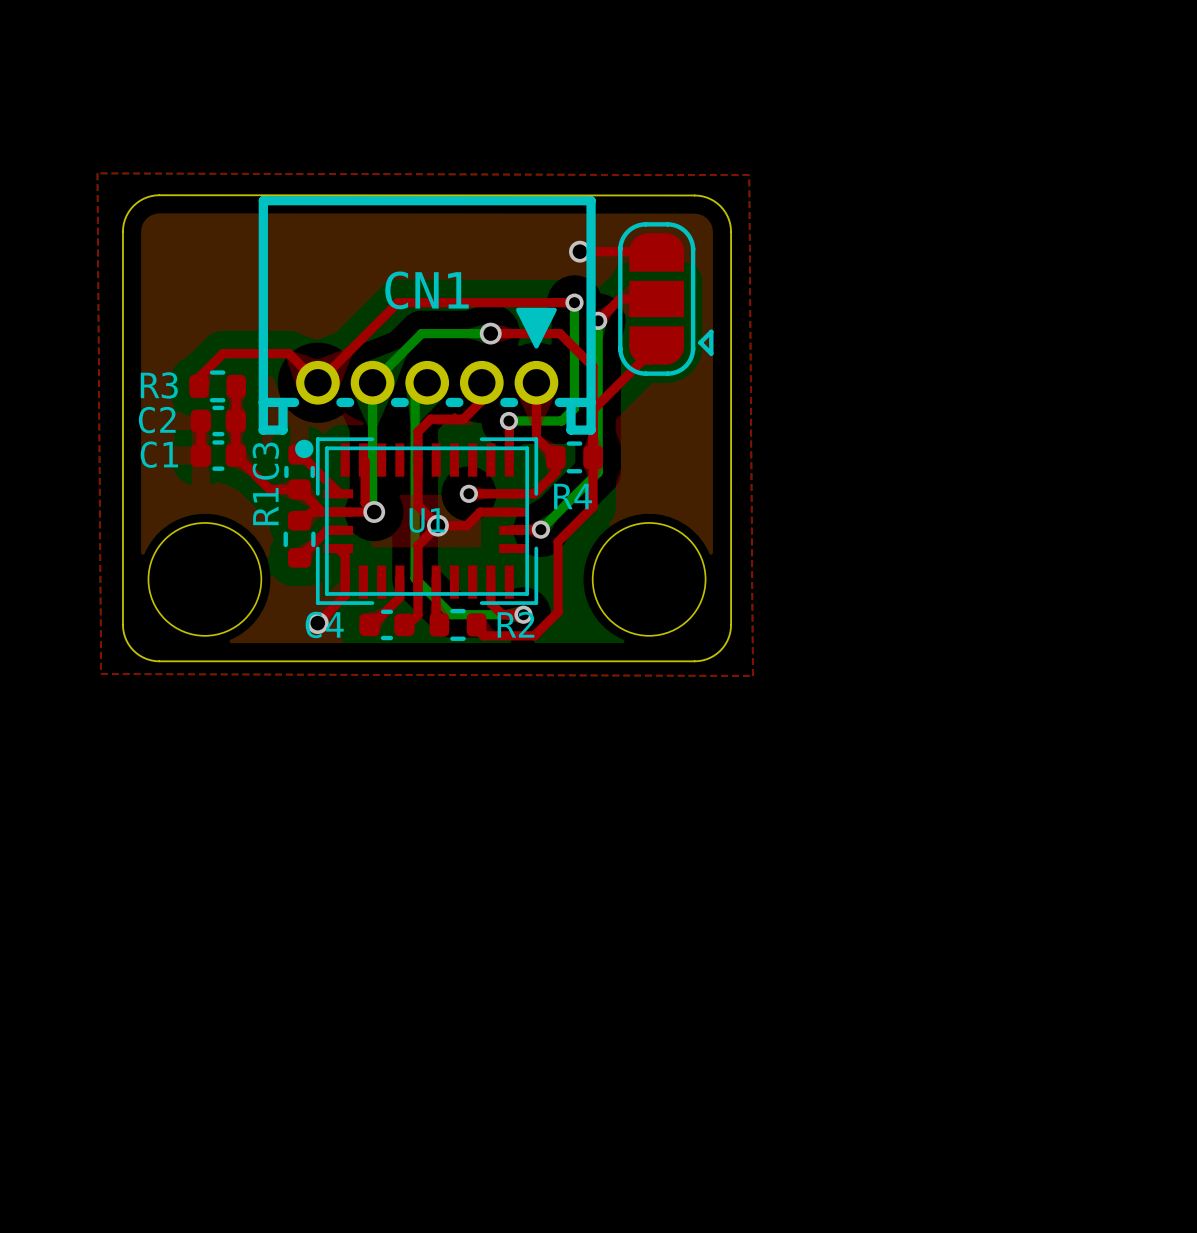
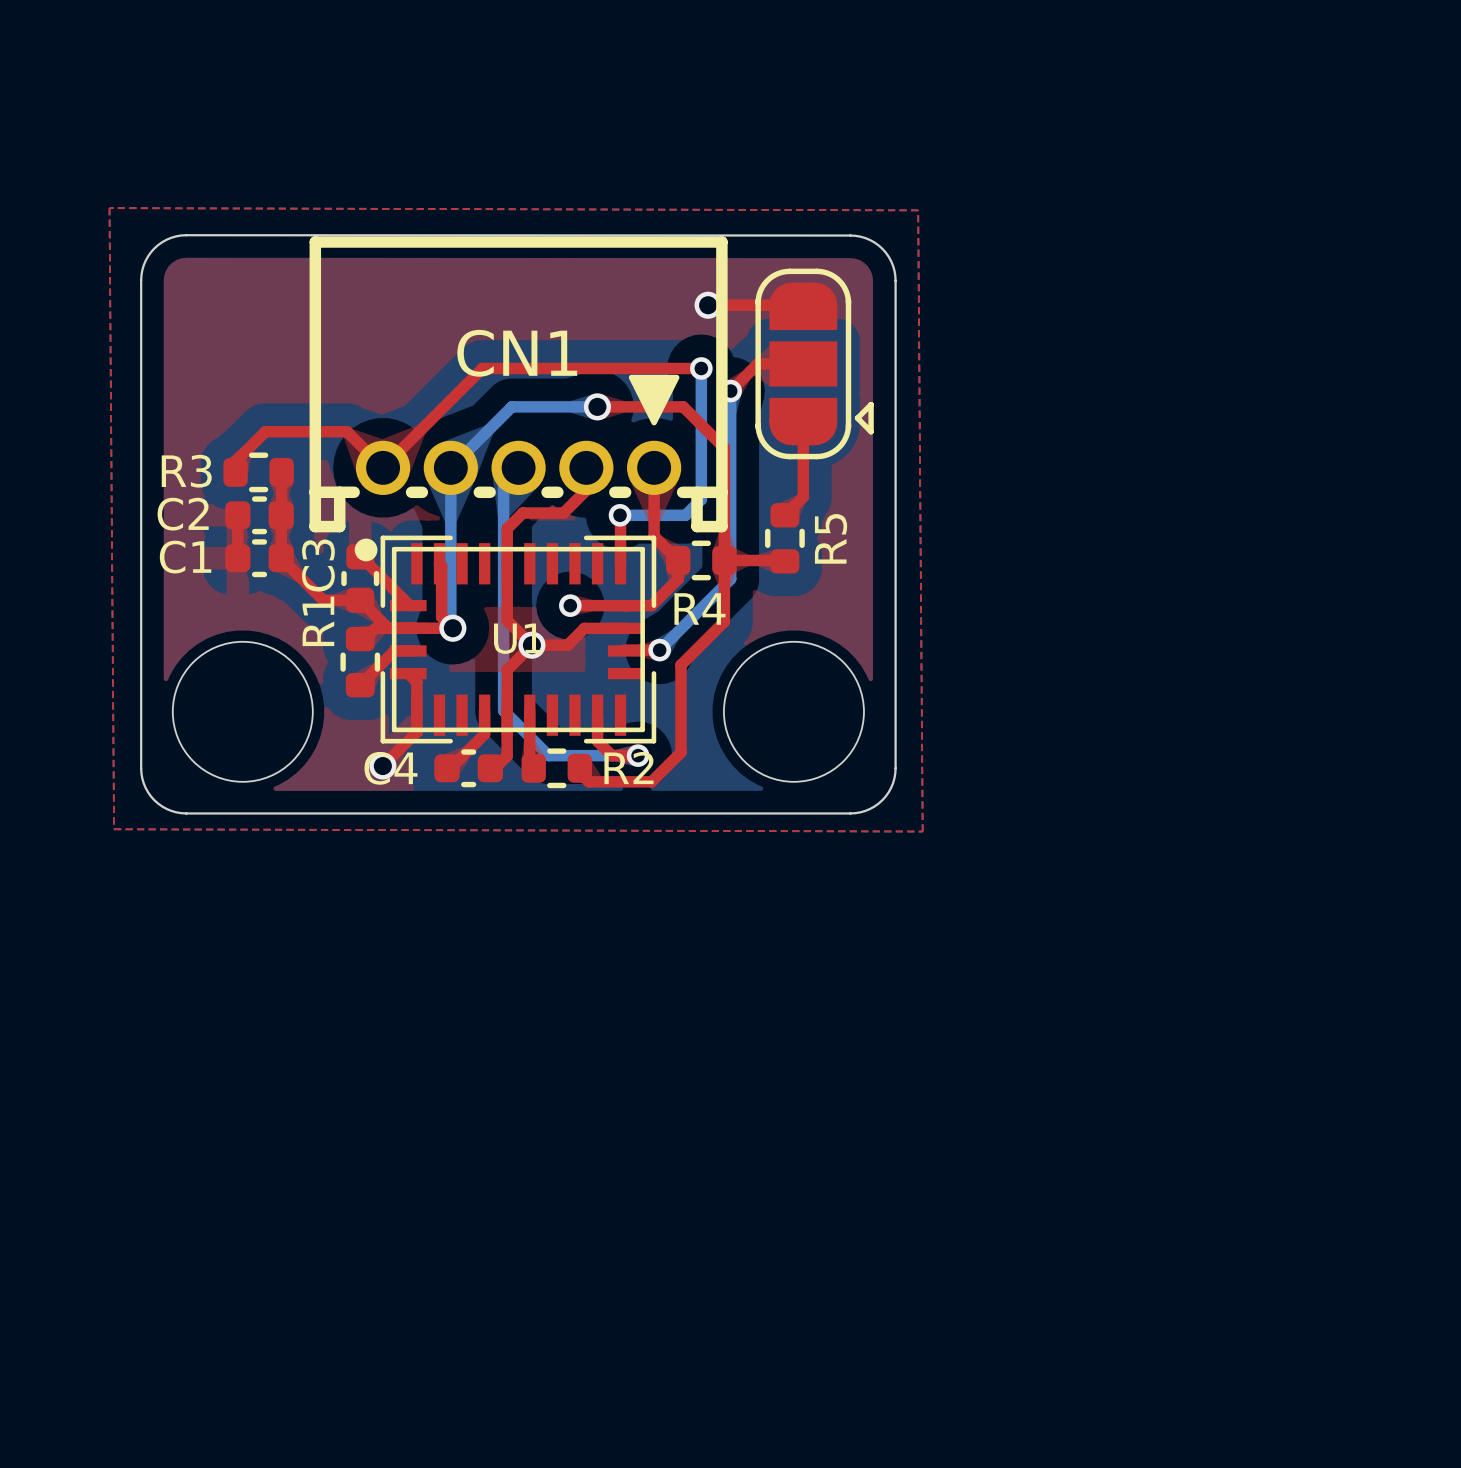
top track: (656, 346) (593, 409) -> (803, 422) (803, 496) (784, 515)
R5: none -> (784, 538)
top track: none -> (724, 560) (784, 561)

